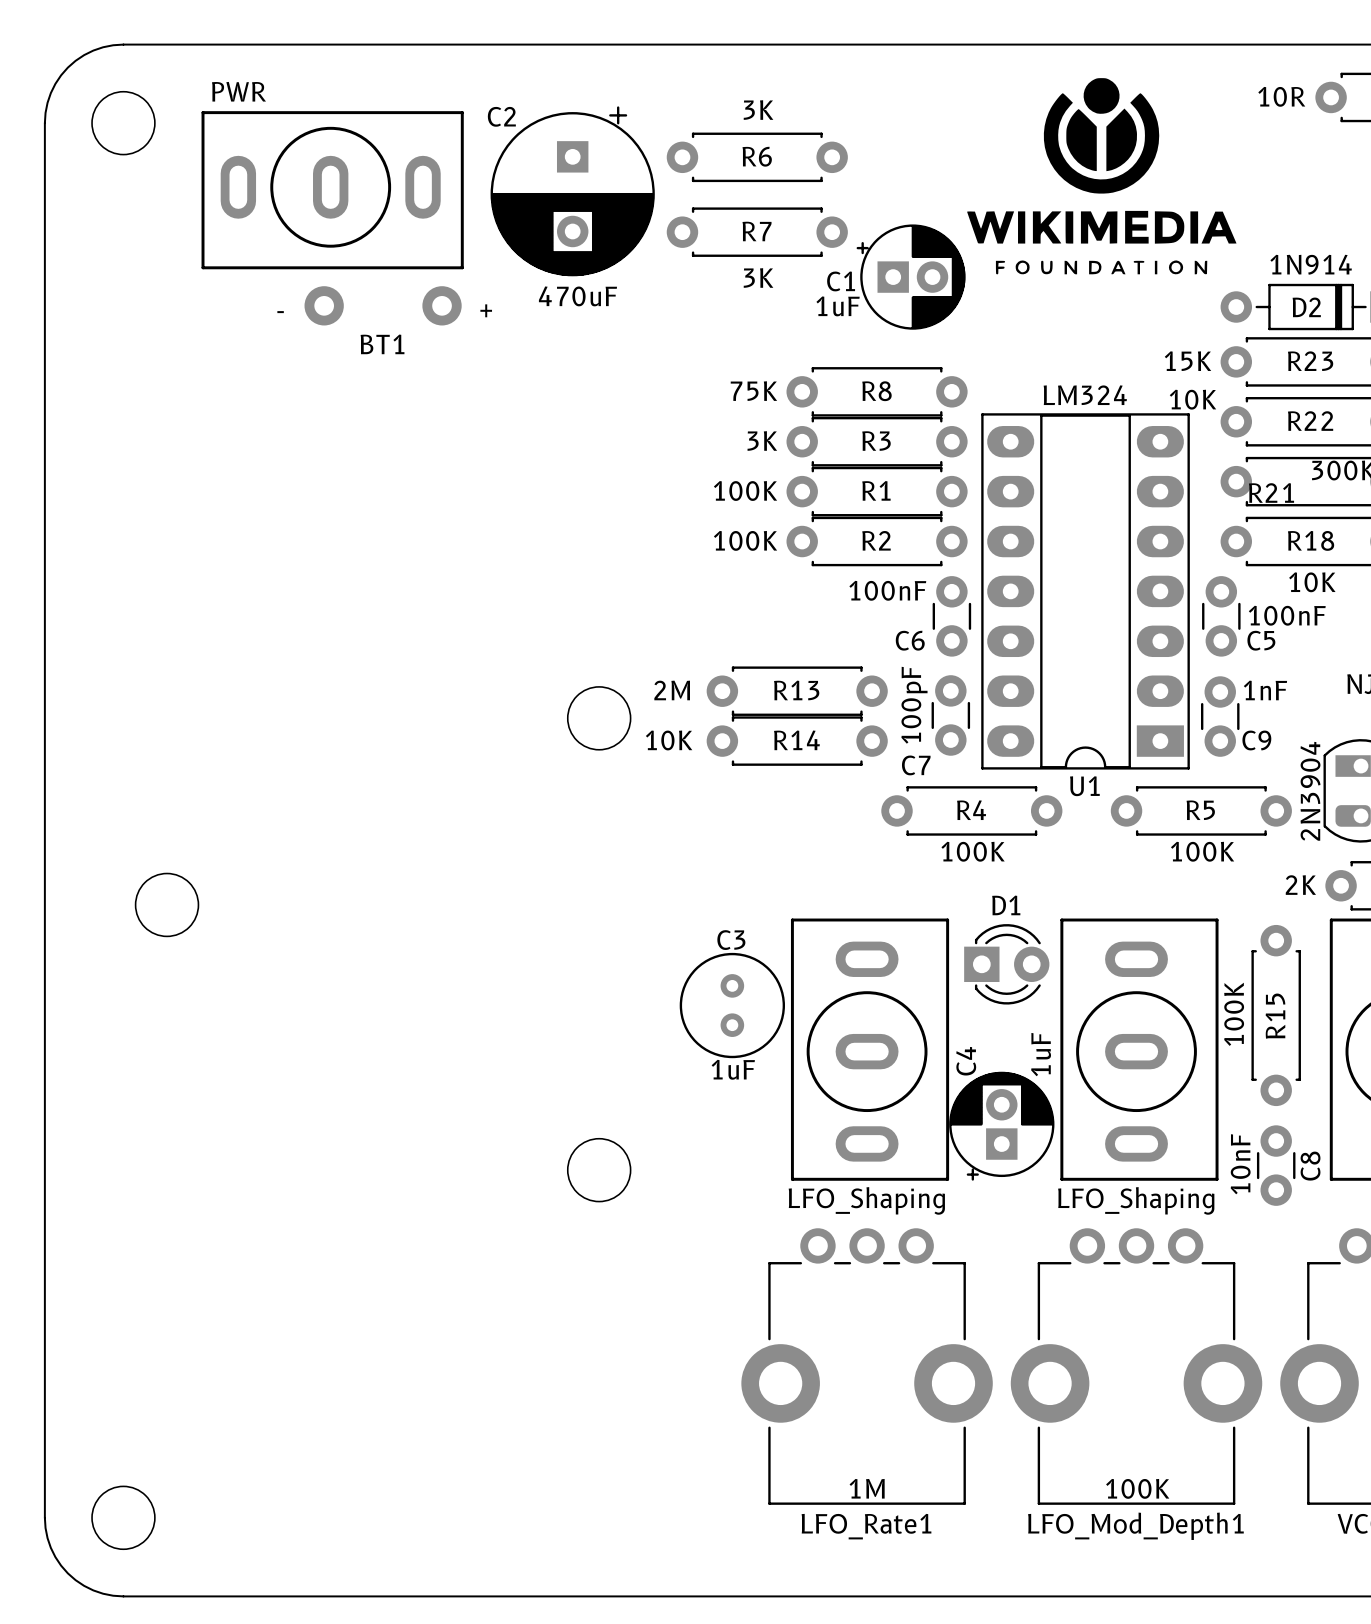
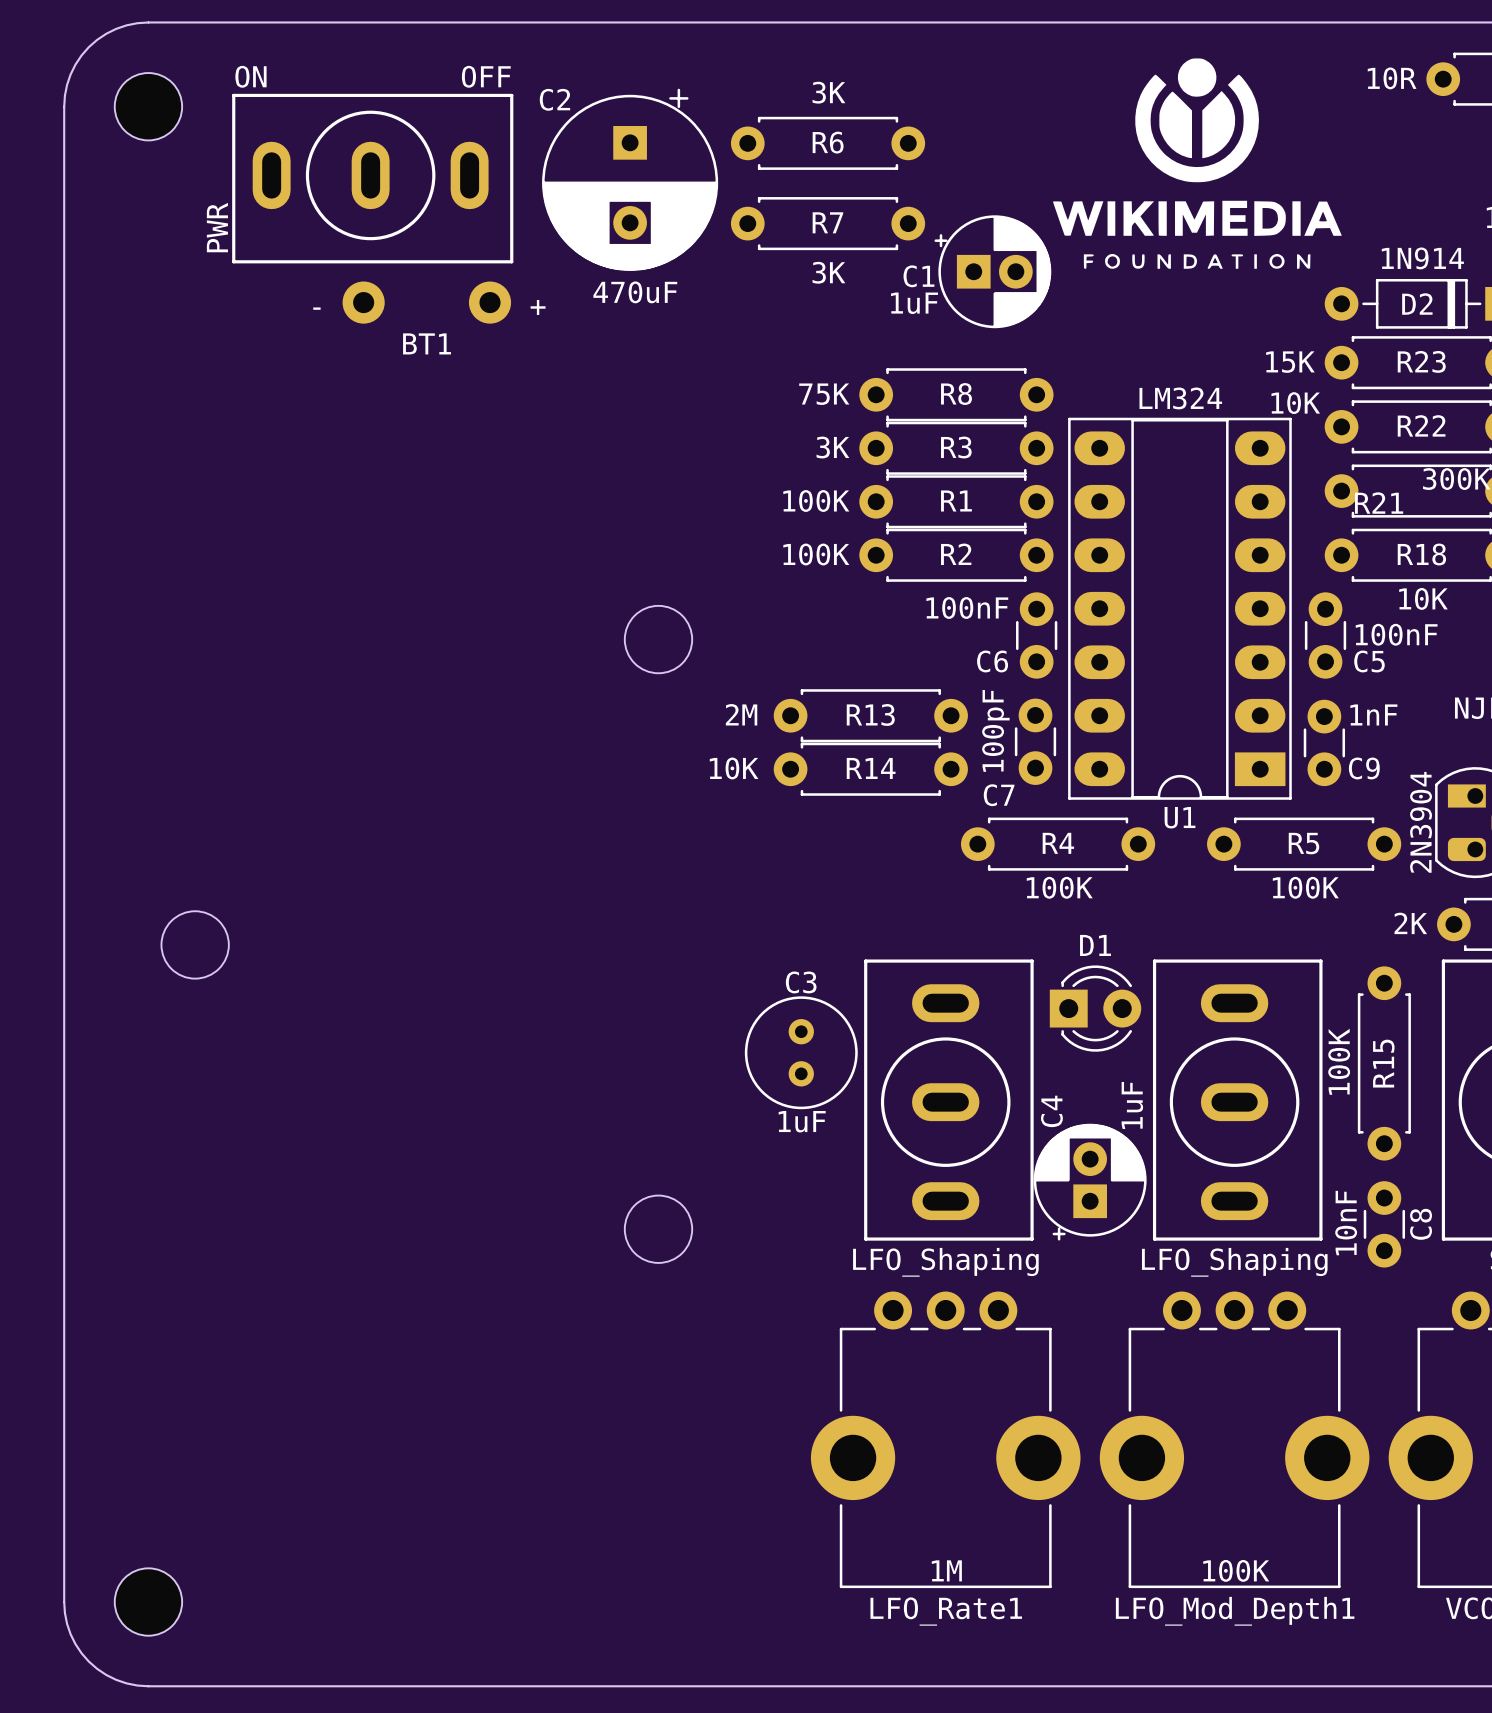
part value rotation: 0° (238, 91) -> 90° counterclockwise (217, 227)
part value position: PWR (238, 91) -> PWR (217, 227)
text: none -> ON (250, 76)
text: none -> OFF (486, 76)
BT1 footprint: [135, 286, 632, 1203] -> [160, 281, 693, 1264]

